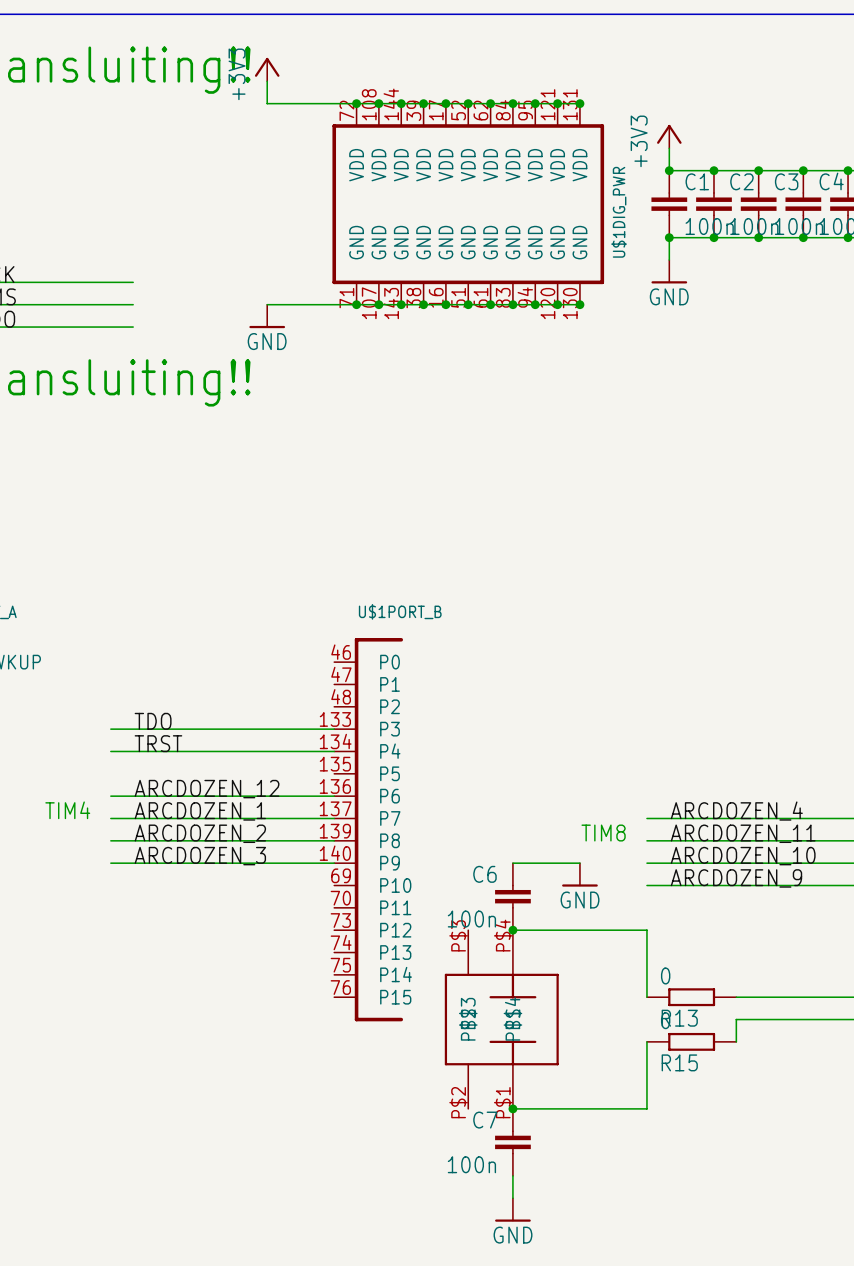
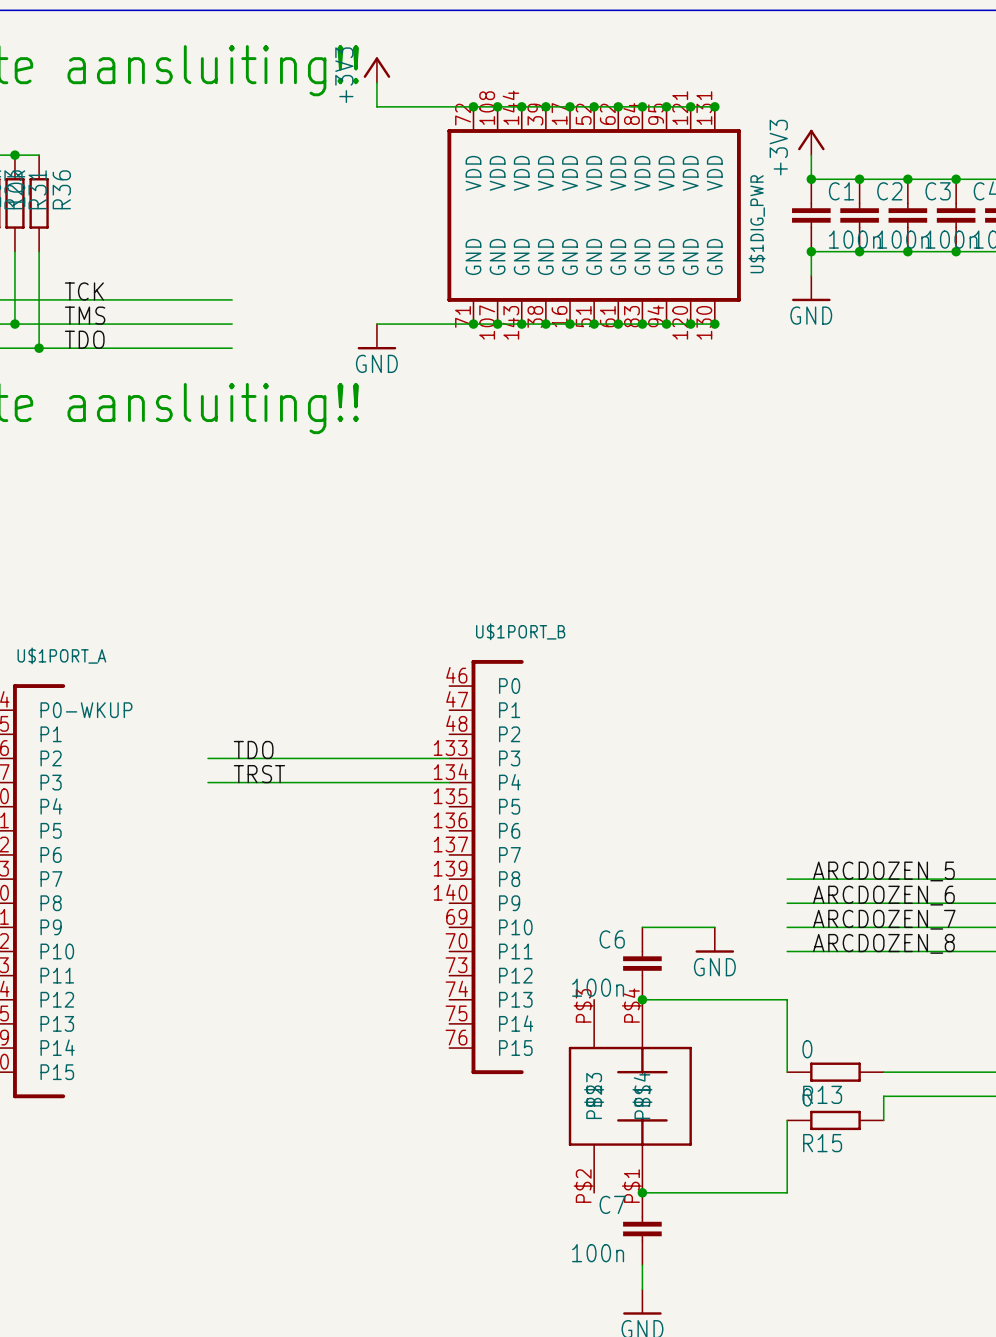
label: none -> TDO (253, 749)
label: TDO (153, 721) -> TRST (259, 774)
label: TRST (158, 743) -> none
wire: (110, 751) (334, 751) -> (208, 758) (449, 758)
label: ARCDOZEN_12 (207, 789) -> none
wire: (110, 796) (334, 796) -> none
text: TIM4 (67, 810) -> none
label: ARCDOZEN_1 (200, 811) -> none
label: ARCDOZEN_4 (736, 811) -> ARCDOZEN_5 (883, 871)
wire: (110, 818) (334, 818) -> none
U$1PORT_B position: (368, 829) -> (486, 867)
label: ARCDOZEN_2 (200, 833) -> none
text: TIM8 (603, 833) -> none
label: ARCDOZEN_11 (743, 833) -> ARCDOZEN_6 (883, 895)
wire: (110, 840) (334, 840) -> none
label: ARCDOZEN_3 (200, 856) -> none
label: ARCDOZEN_10 (743, 856) -> ARCDOZEN_7 (884, 919)
wire: (110, 863) (334, 863) -> none
label: ARCDOZEN_9 (736, 878) -> ARCDOZEN_8 (883, 943)

